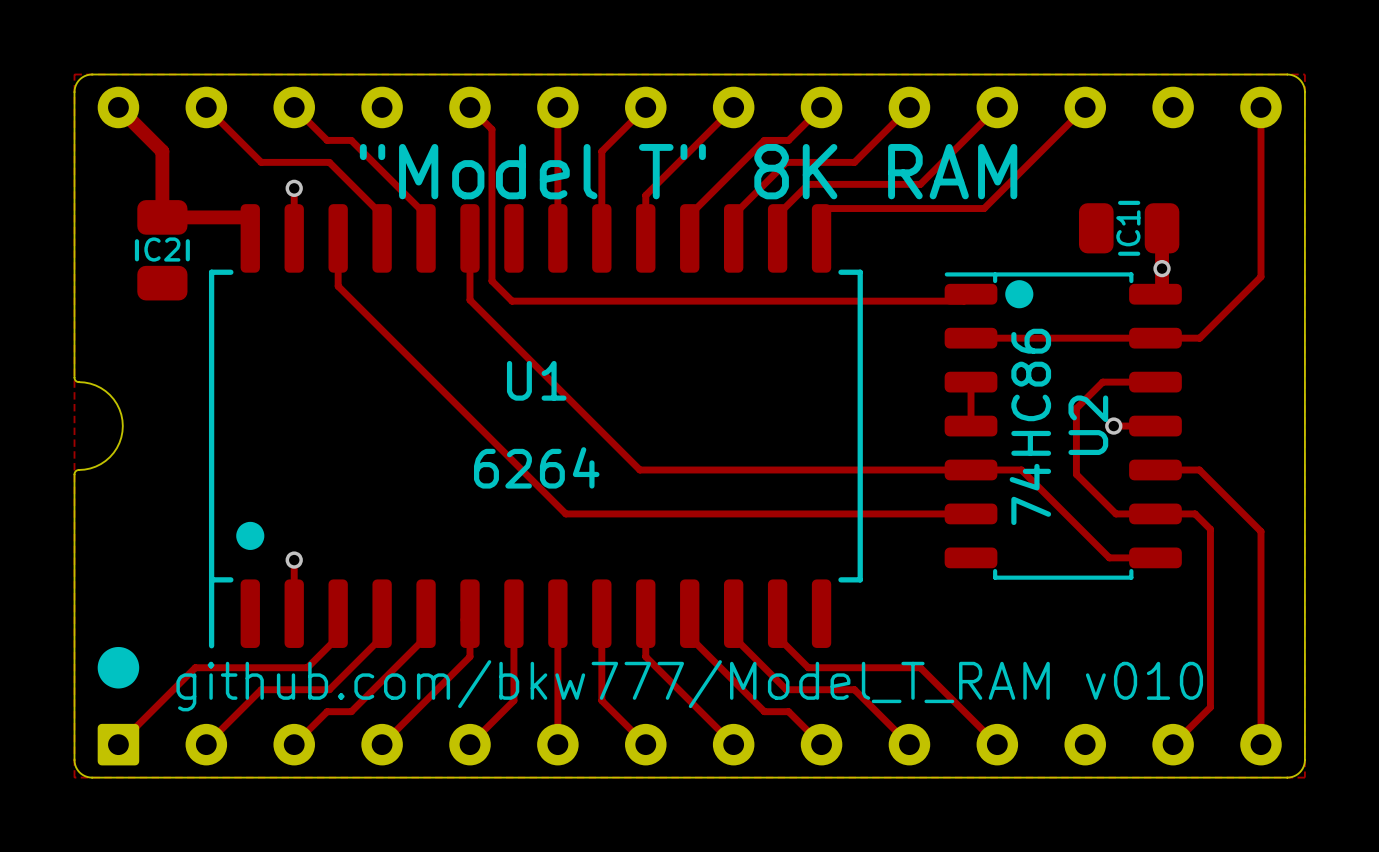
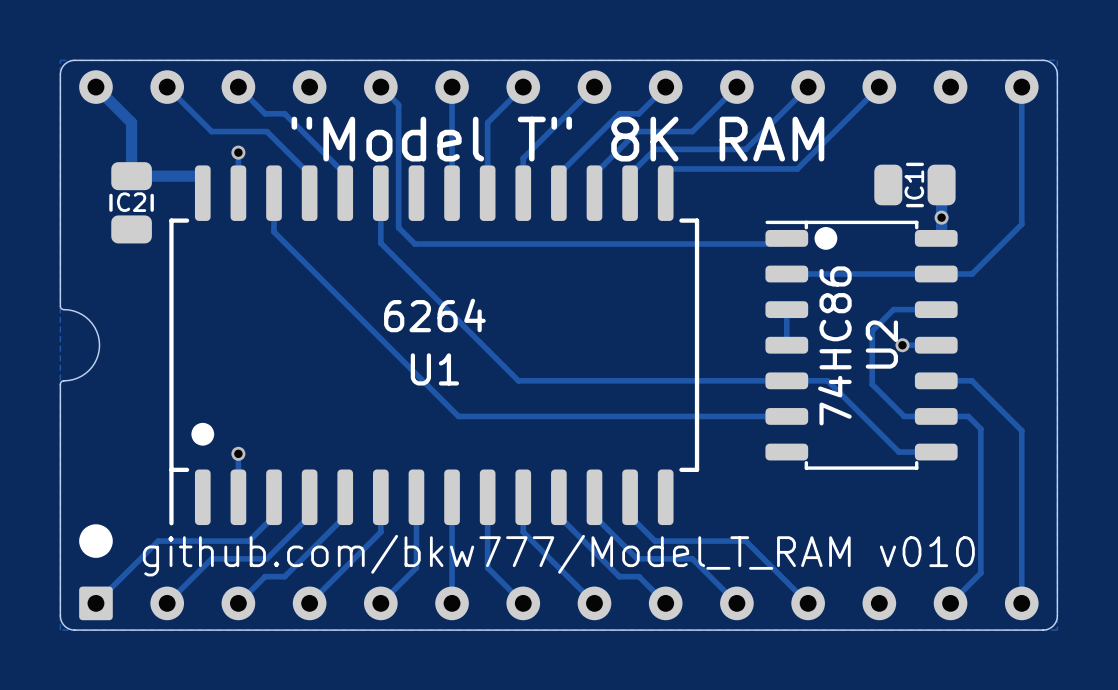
U1 name position: U1 (536, 380) -> U1 (434, 369)
U1 value position: 6264 (536, 467) -> 6264 (434, 315)

